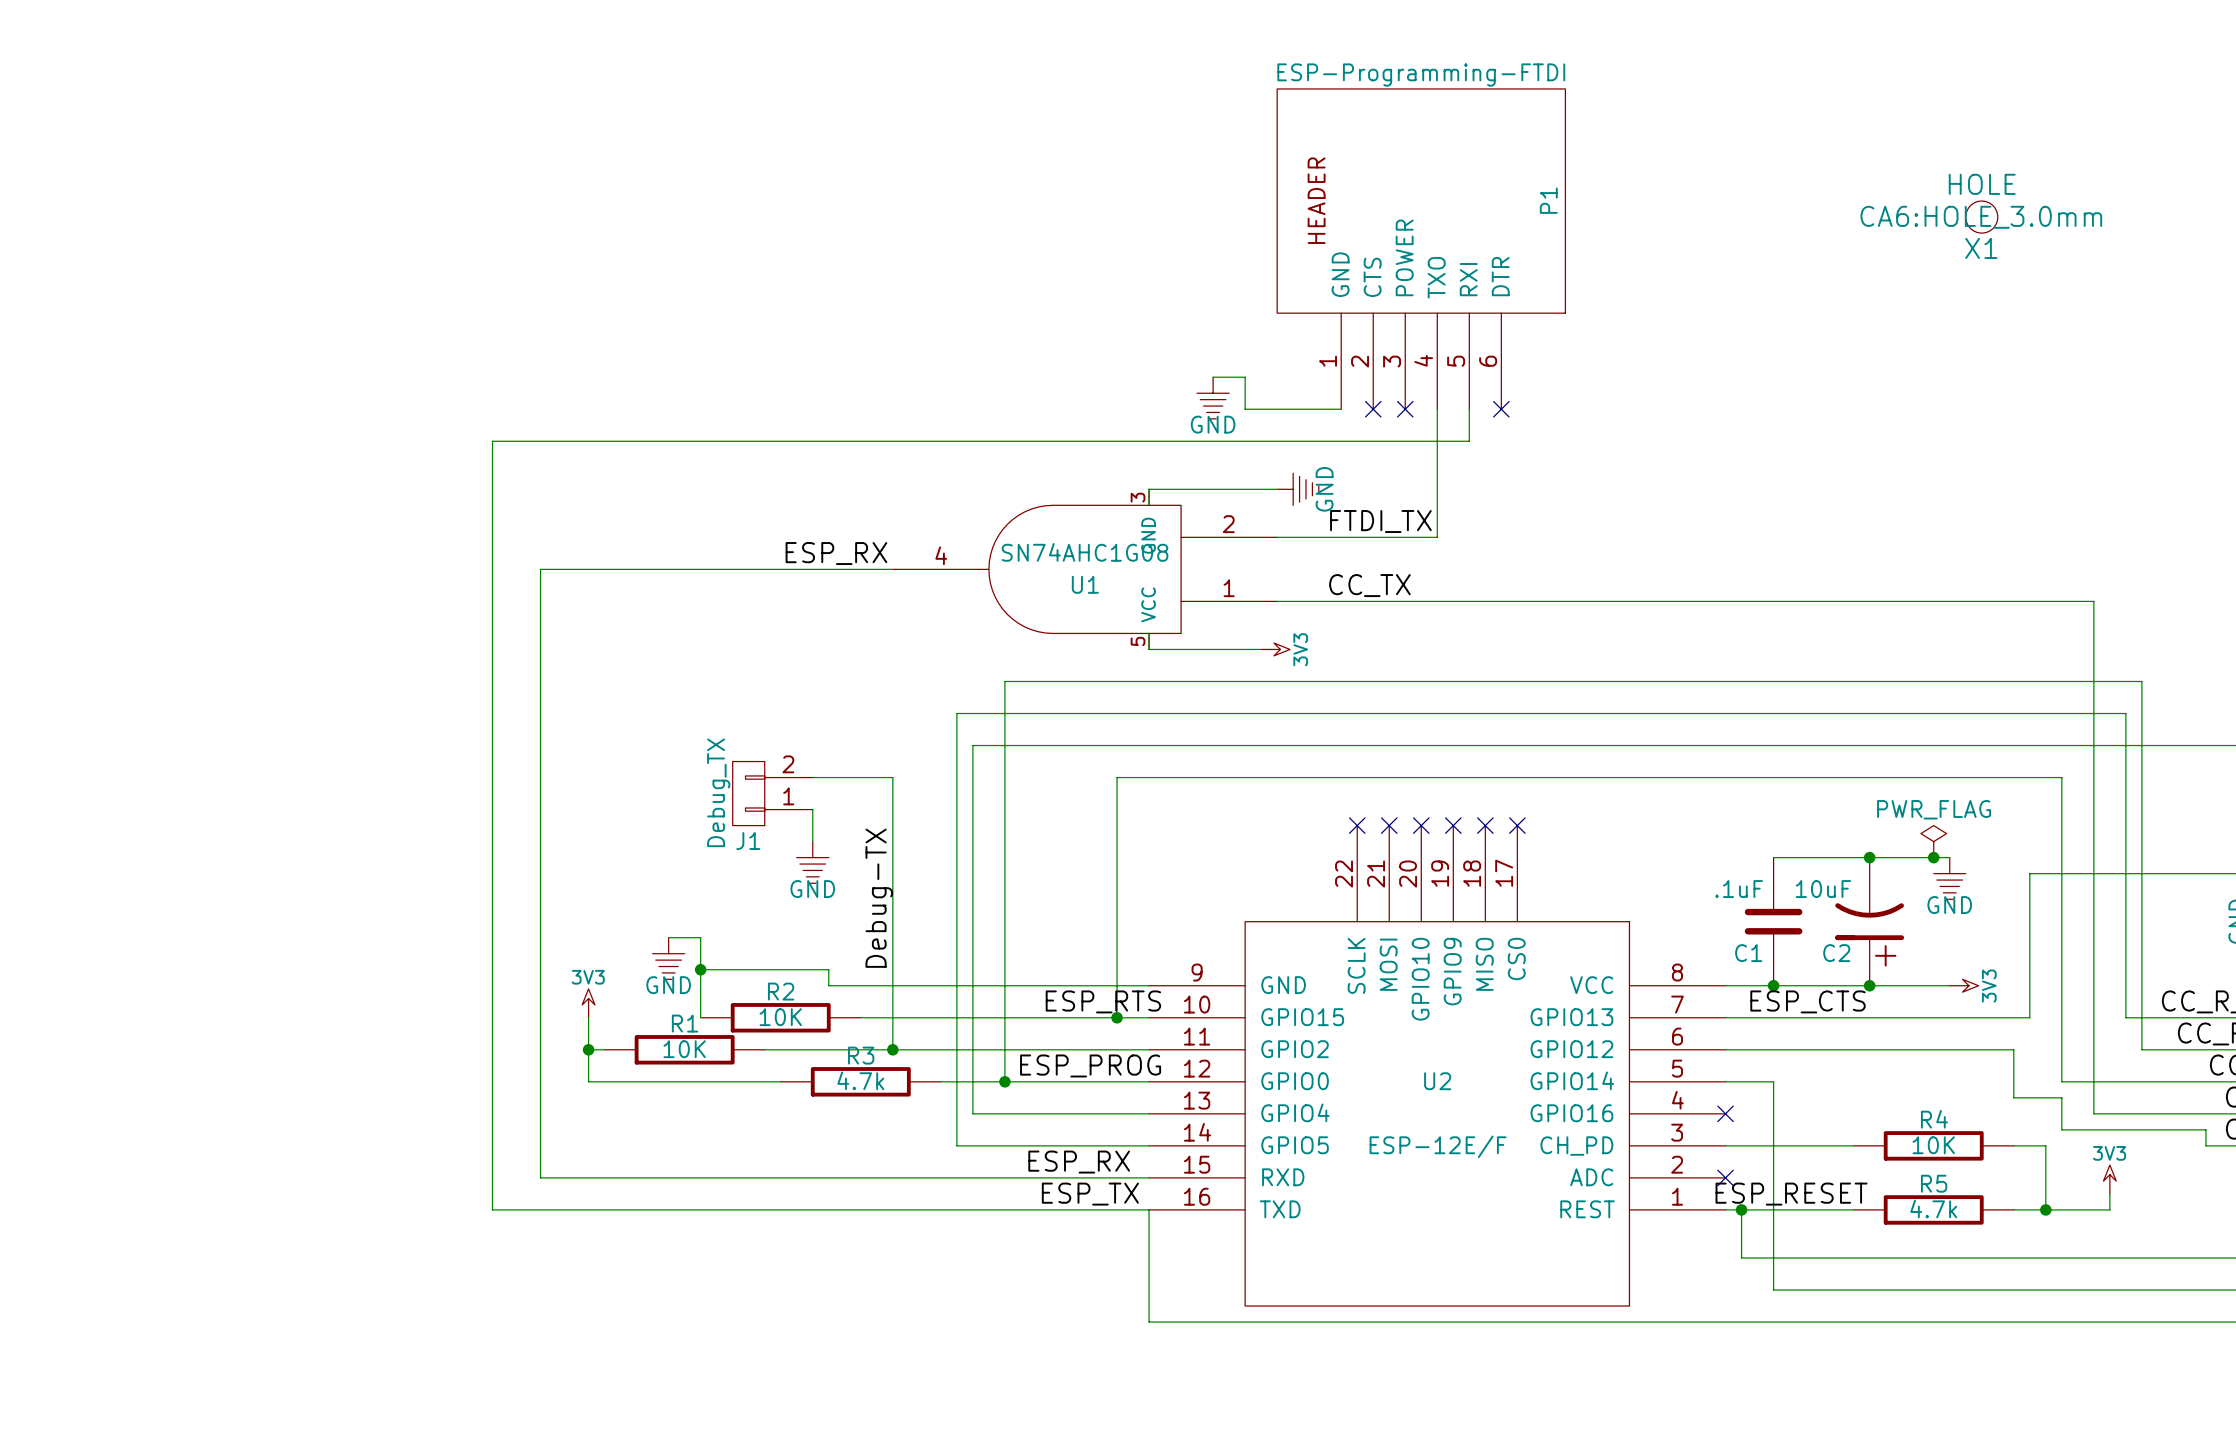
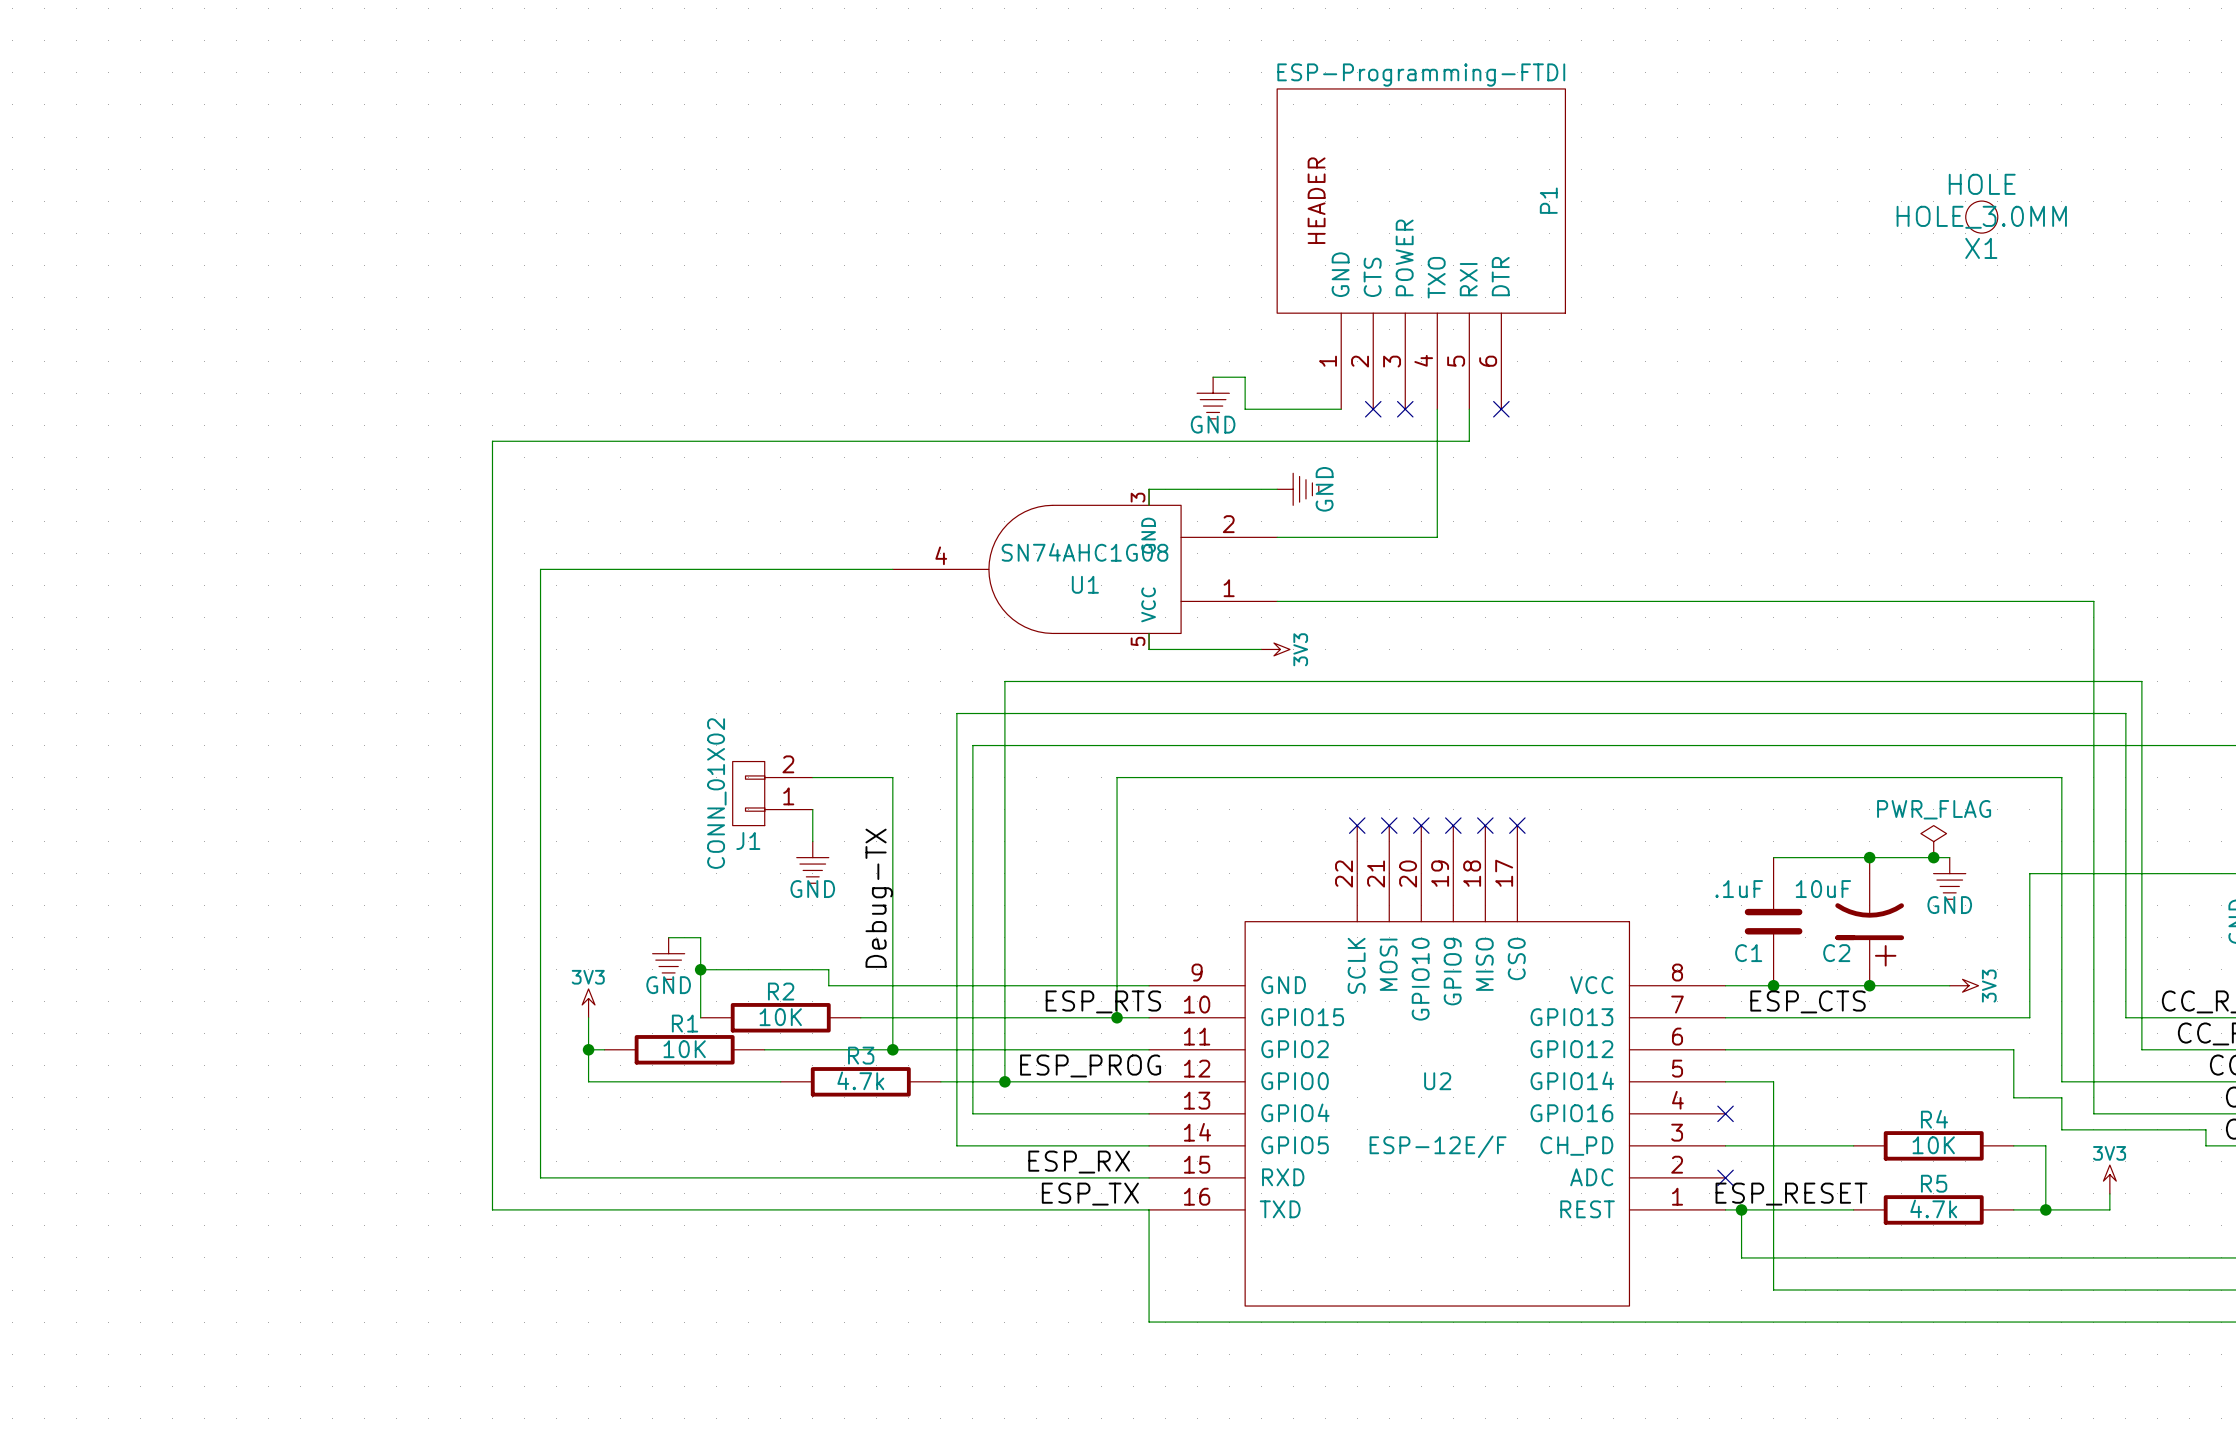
X1 text: CA6:HOLE_3.0mm (1981, 217) -> HOLE_3.0MM (1981, 217)
label: FTDI_TX (1380, 521) -> none
label: ESP_RX (836, 553) -> none
label: CC_TX (1369, 585) -> none
J1 value: Debug_TX (718, 792) -> CONN_01X02 (716, 793)

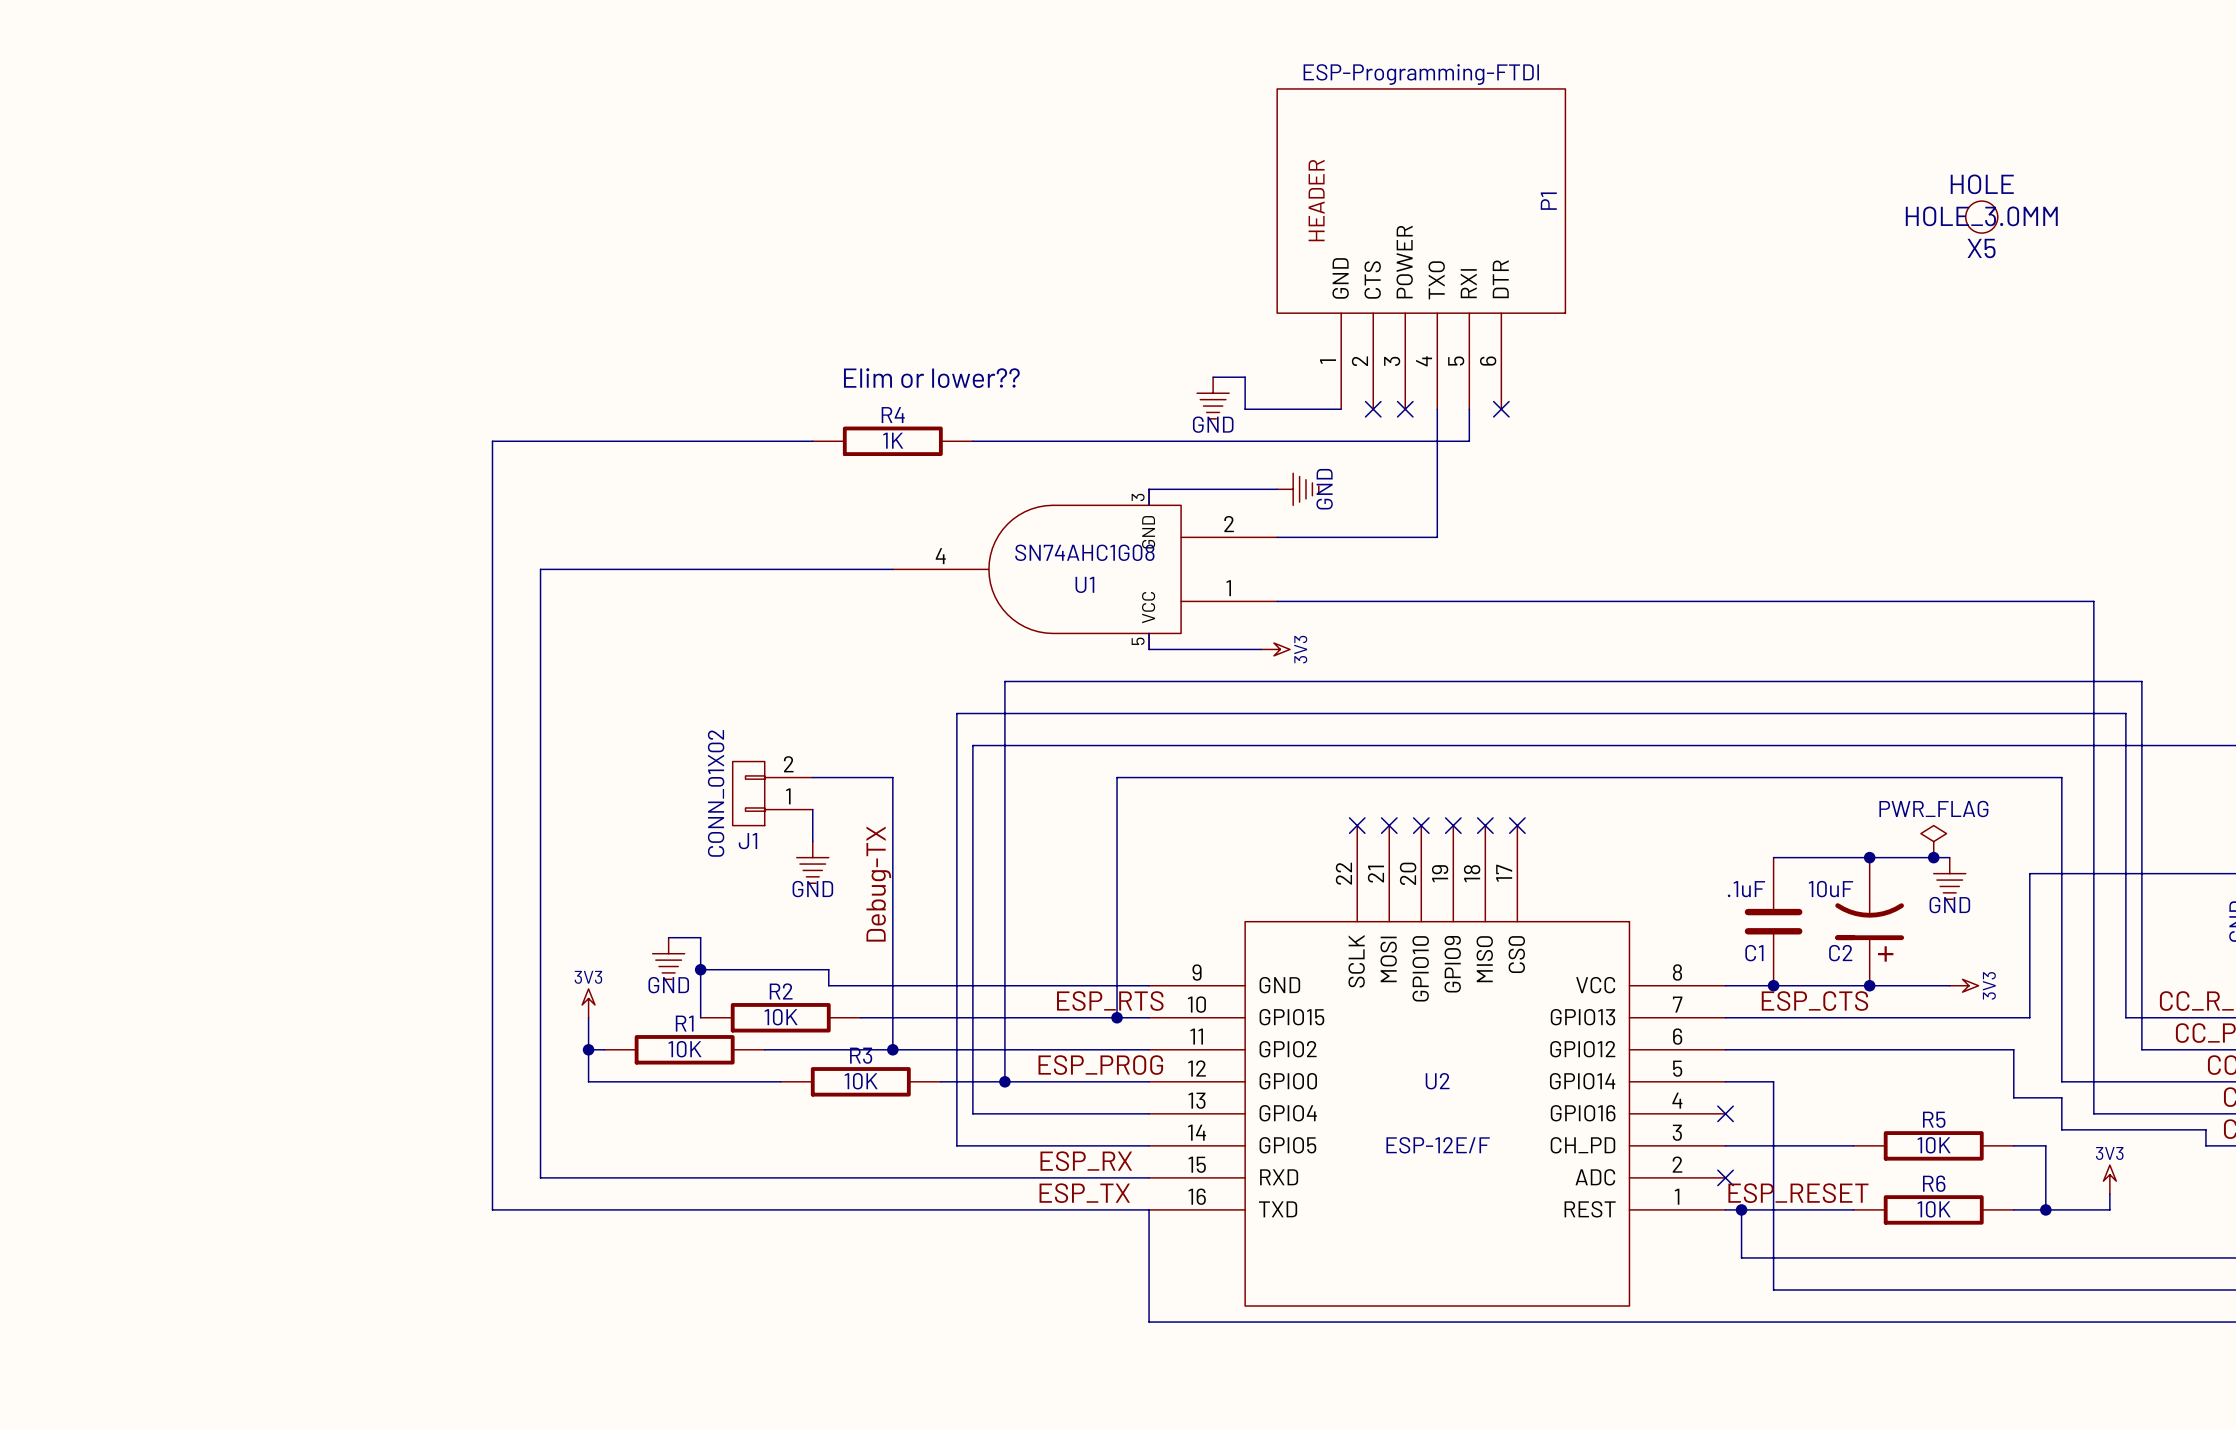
X1 name: X1 (1981, 248) -> X5 (1981, 248)
text: none -> Elim or lower?? (931, 378)
wire: (812, 441) (972, 441) -> none
R4: none -> 1K (892, 441)
R3 value: 4.7k (860, 1080) -> 10K (861, 1081)
R4 name: R4 (1934, 1119) -> R5 (1934, 1119)
R5 name: R5 (1934, 1183) -> R6 (1934, 1183)
R5 value: 4.7k (1933, 1208) -> 10K (1934, 1209)

